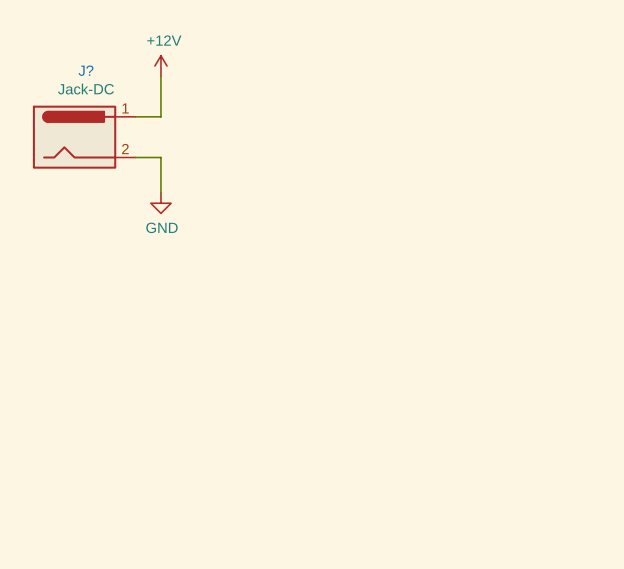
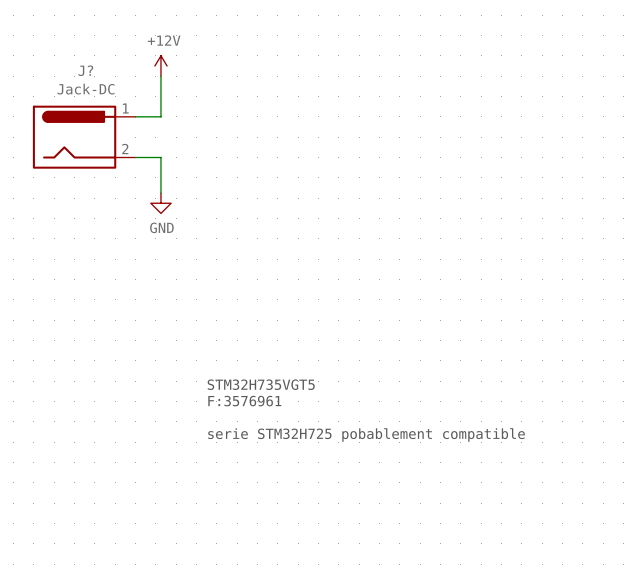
text: none -> STM32H735VGT5 (261, 384)
text: none -> F:3576961 (244, 401)
text: none -> serie STM32H725 pobablement compatible (366, 435)

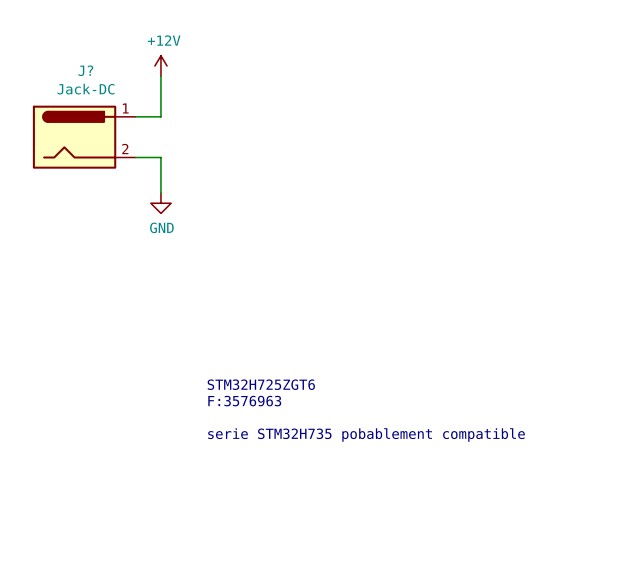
text: STM32H735VGT5 (261, 384) -> STM32H725ZGT6 (261, 384)
text: F:3576961 (244, 401) -> F:3576963 (244, 401)
text: serie STM32H725 pobablement compatible (366, 435) -> serie STM32H735 pobablement compatible (366, 435)

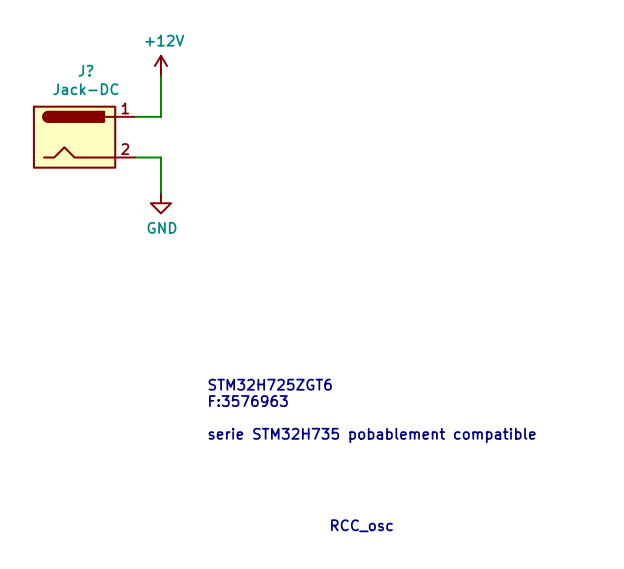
text: none -> RCC_osc (361, 525)

